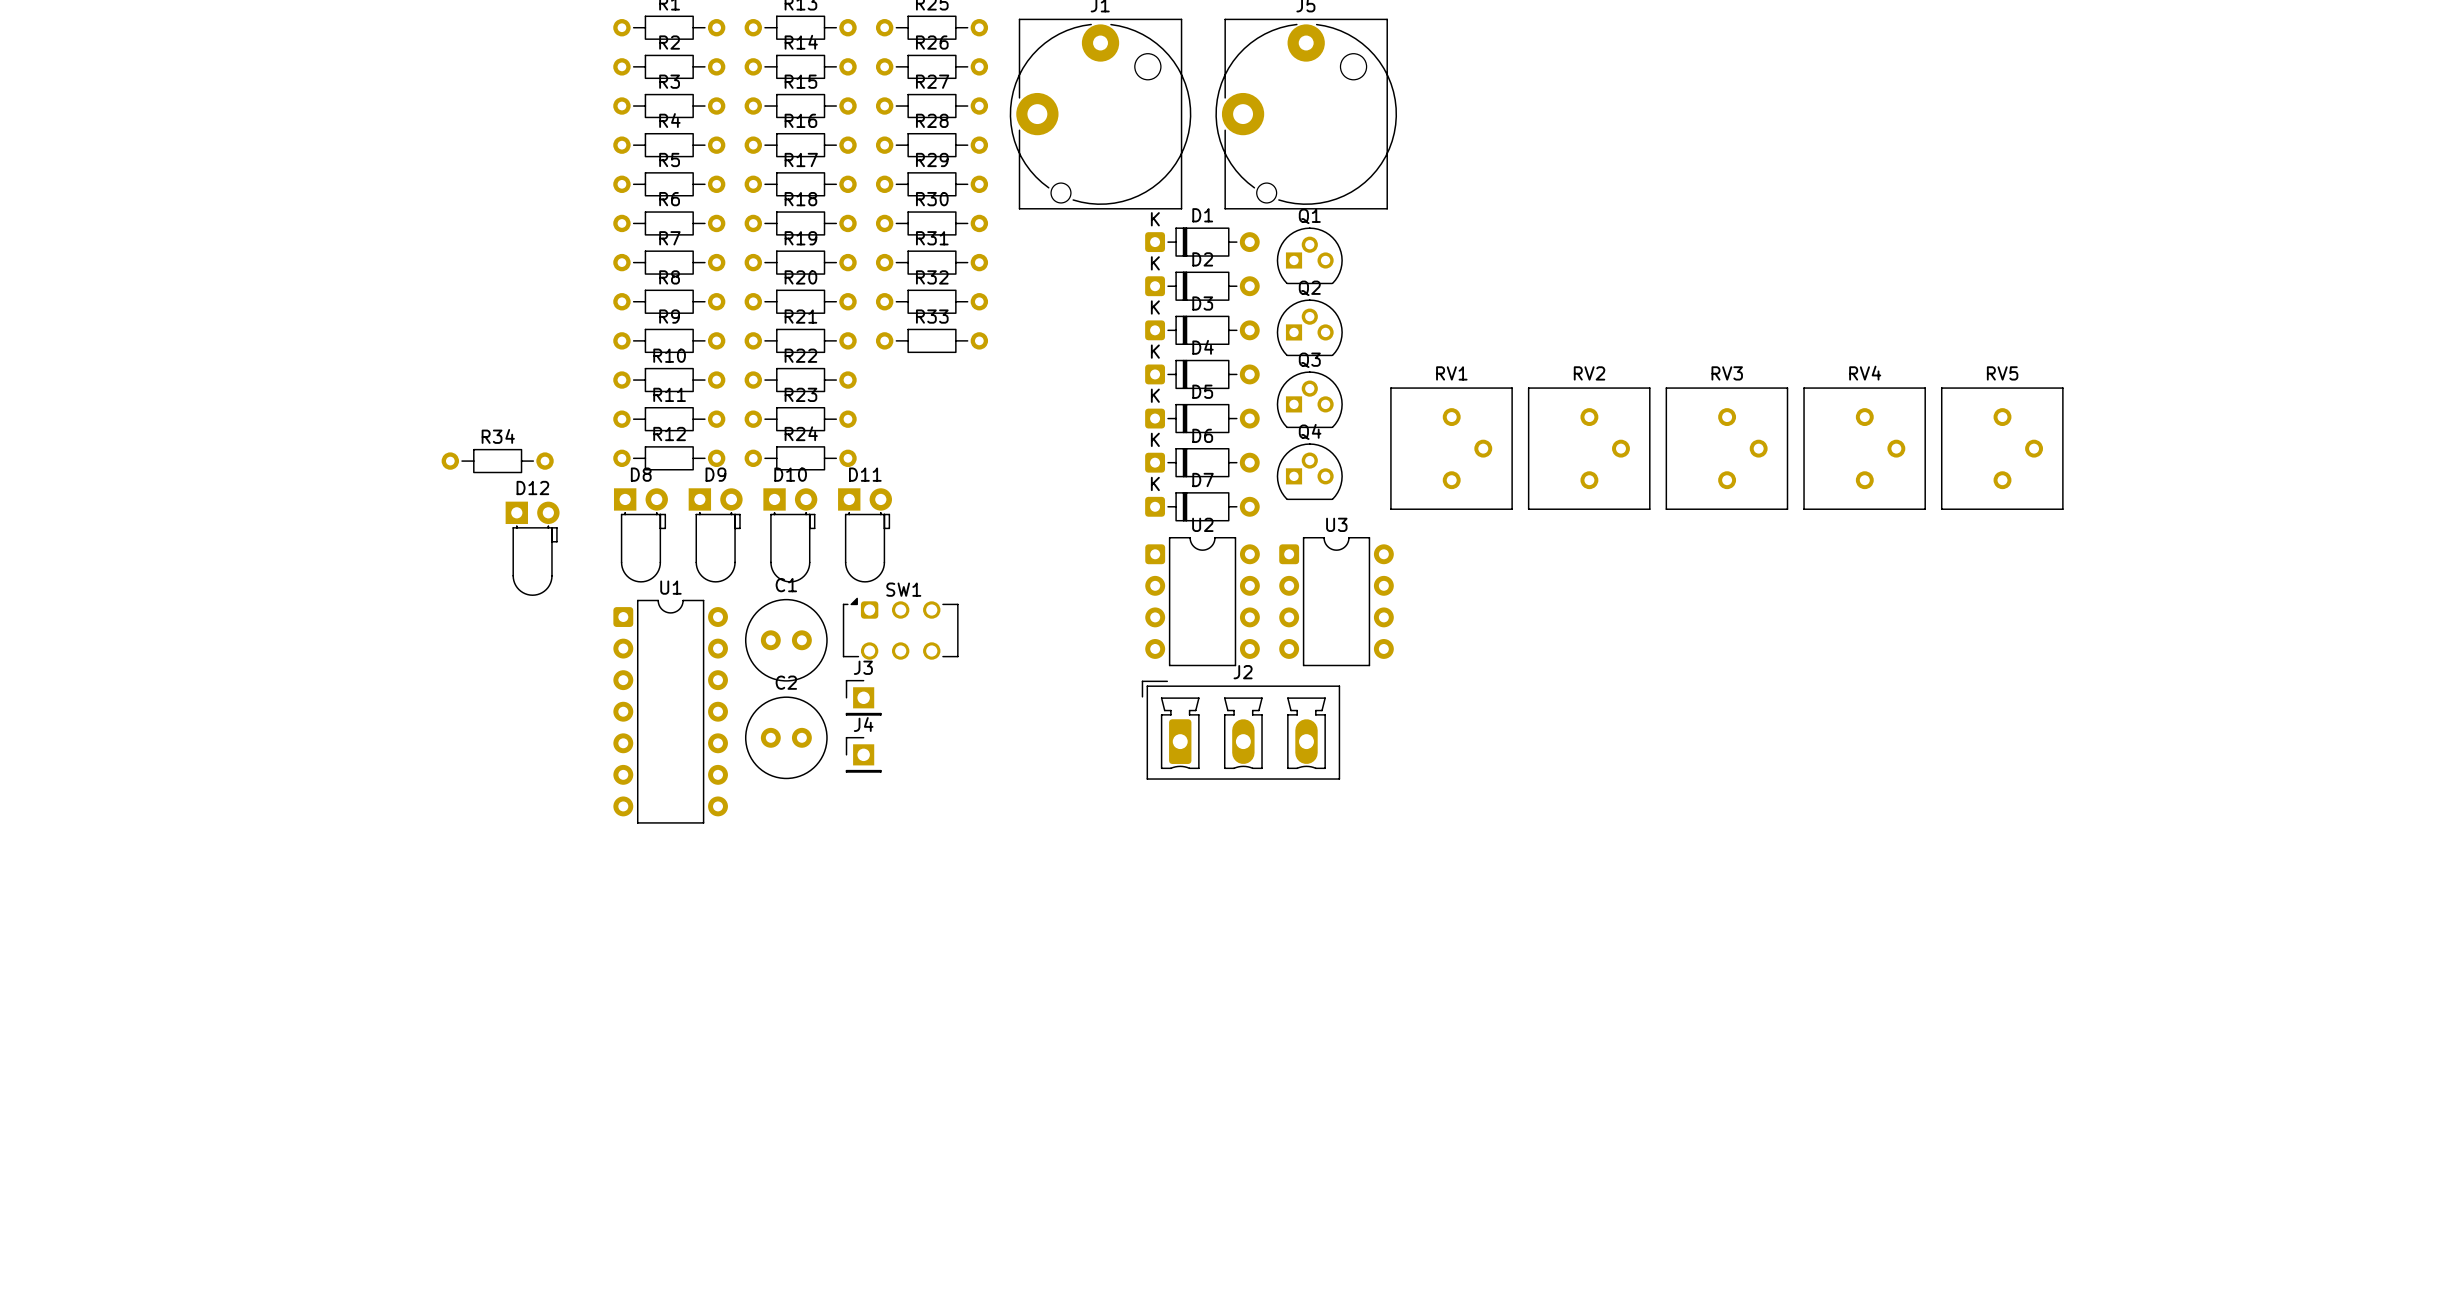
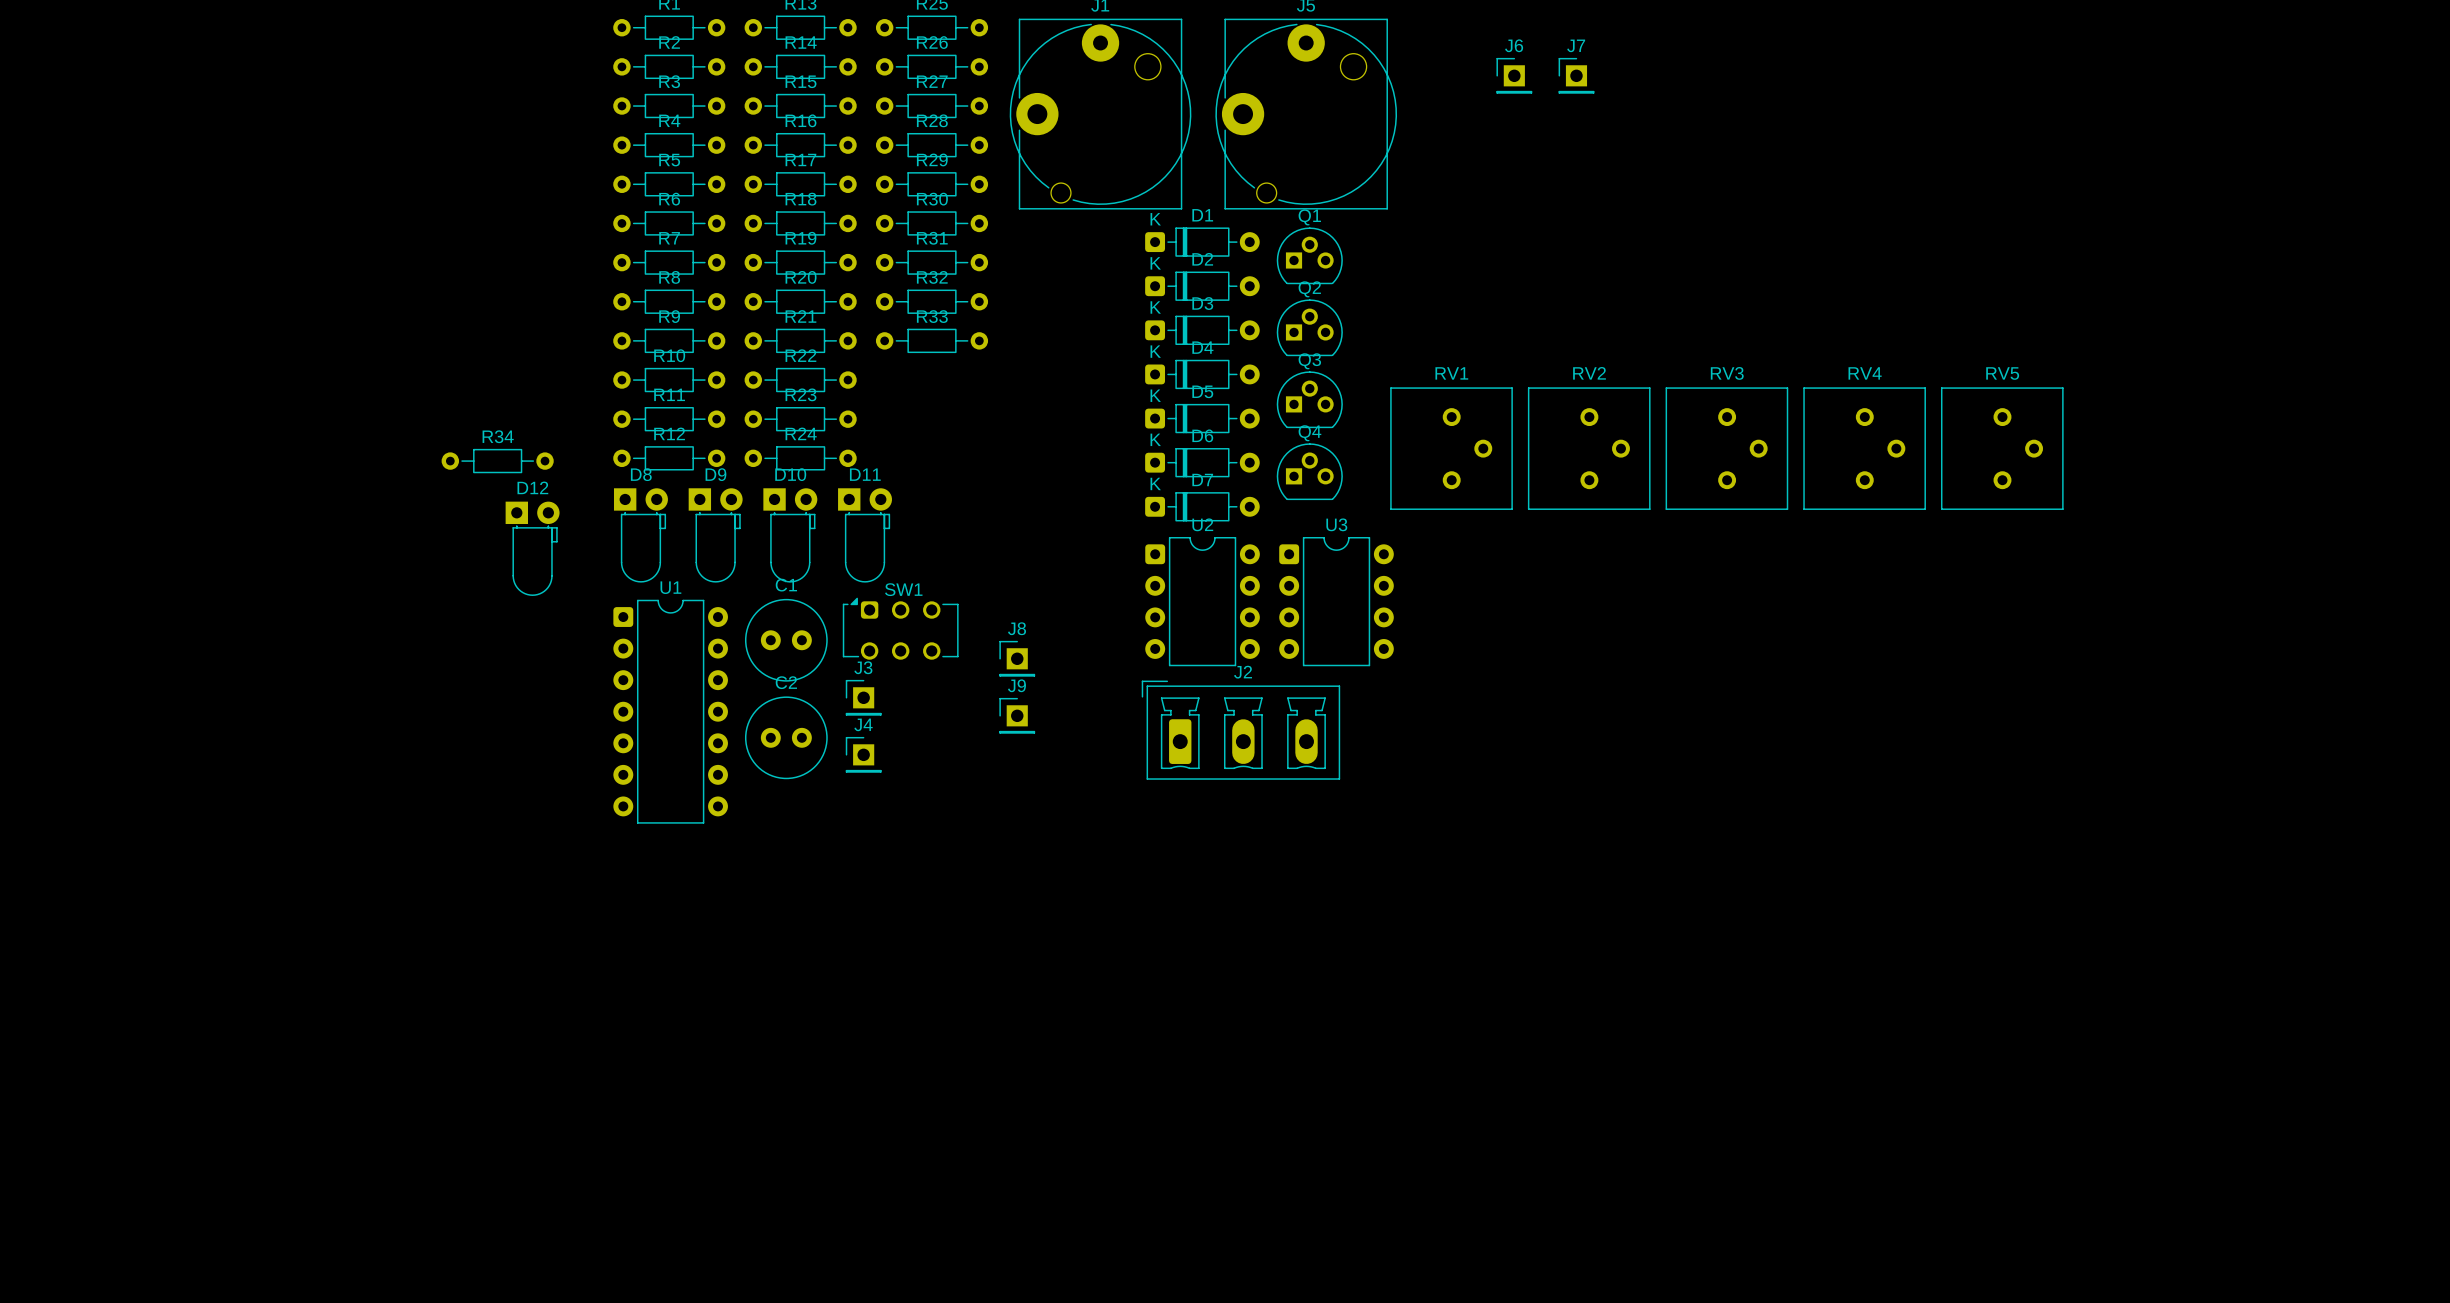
J6: none -> (1514, 75)
J7: none -> (1576, 75)
J8: none -> (1017, 658)
J9: none -> (1017, 715)

